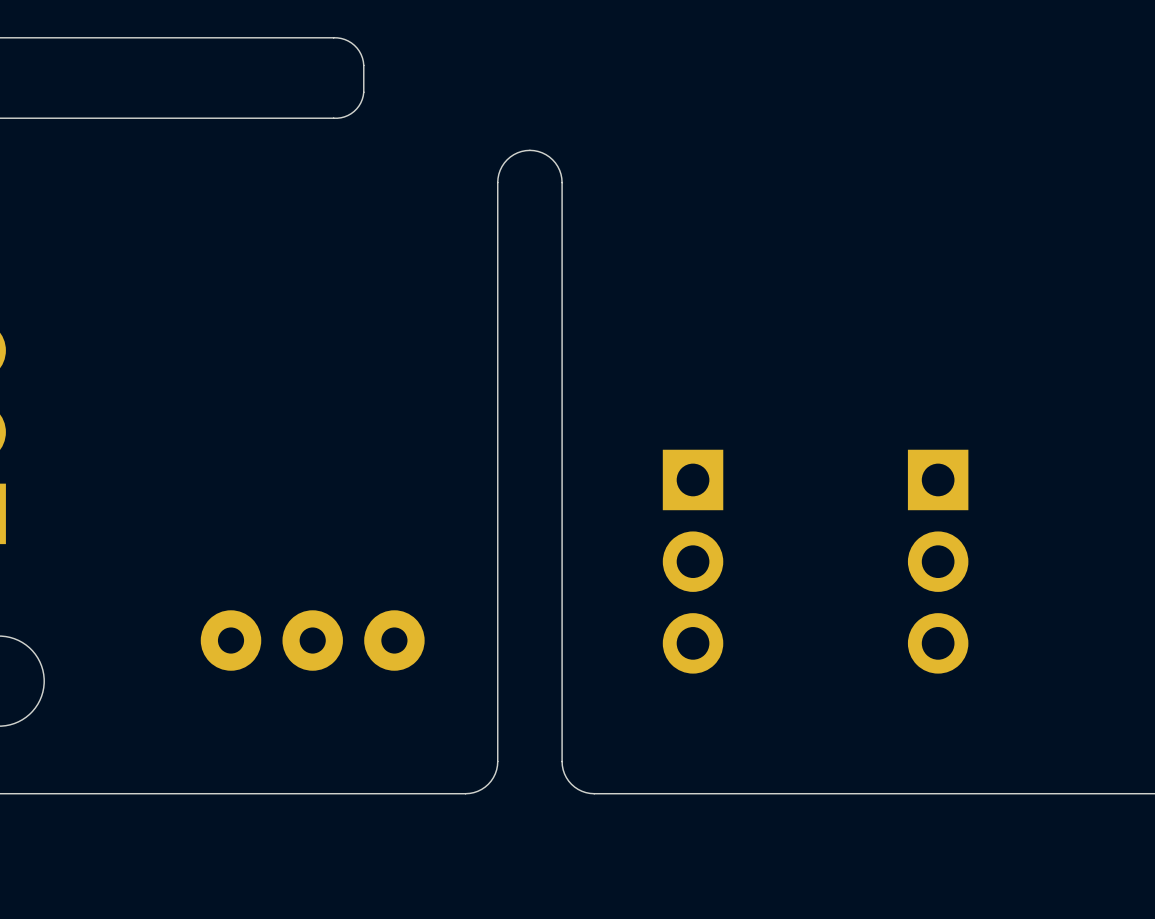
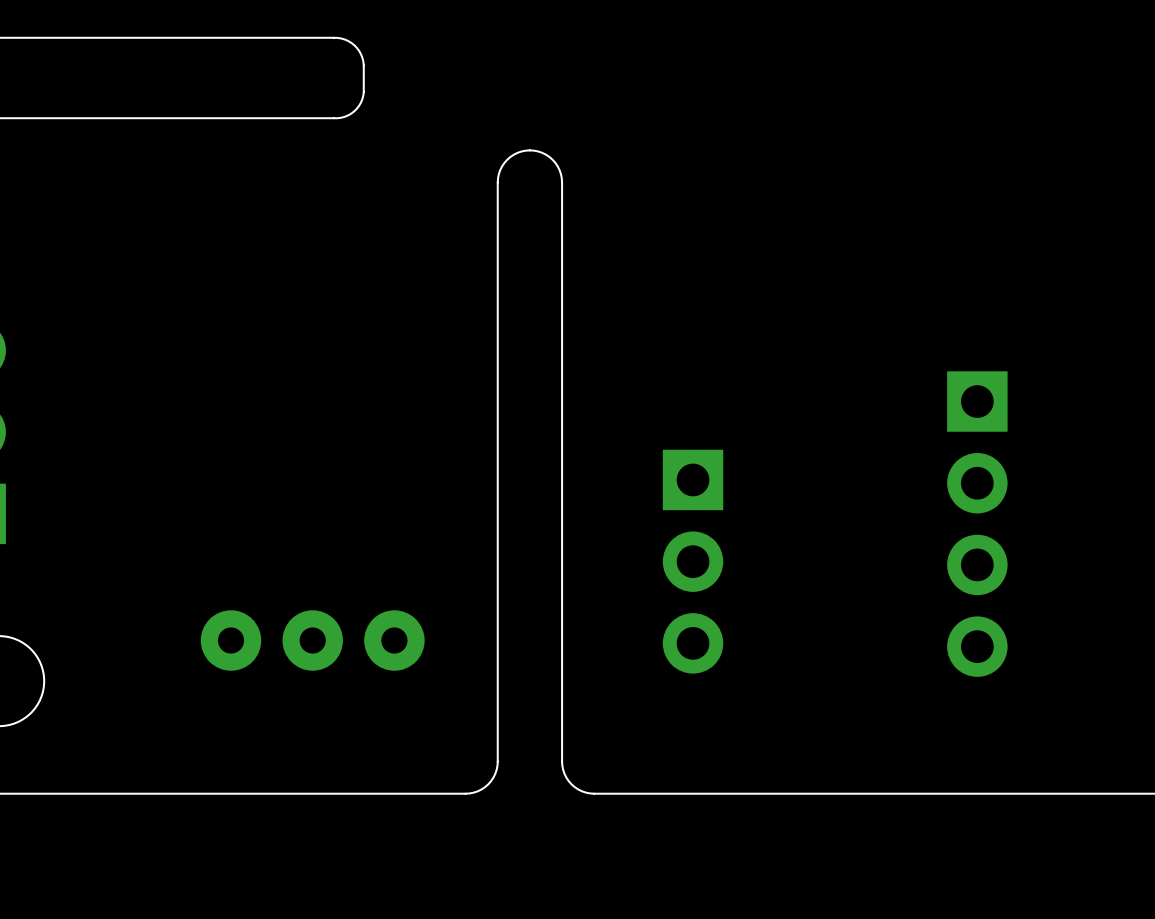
part: none -> (977, 524)
part: (938, 561) -> none

